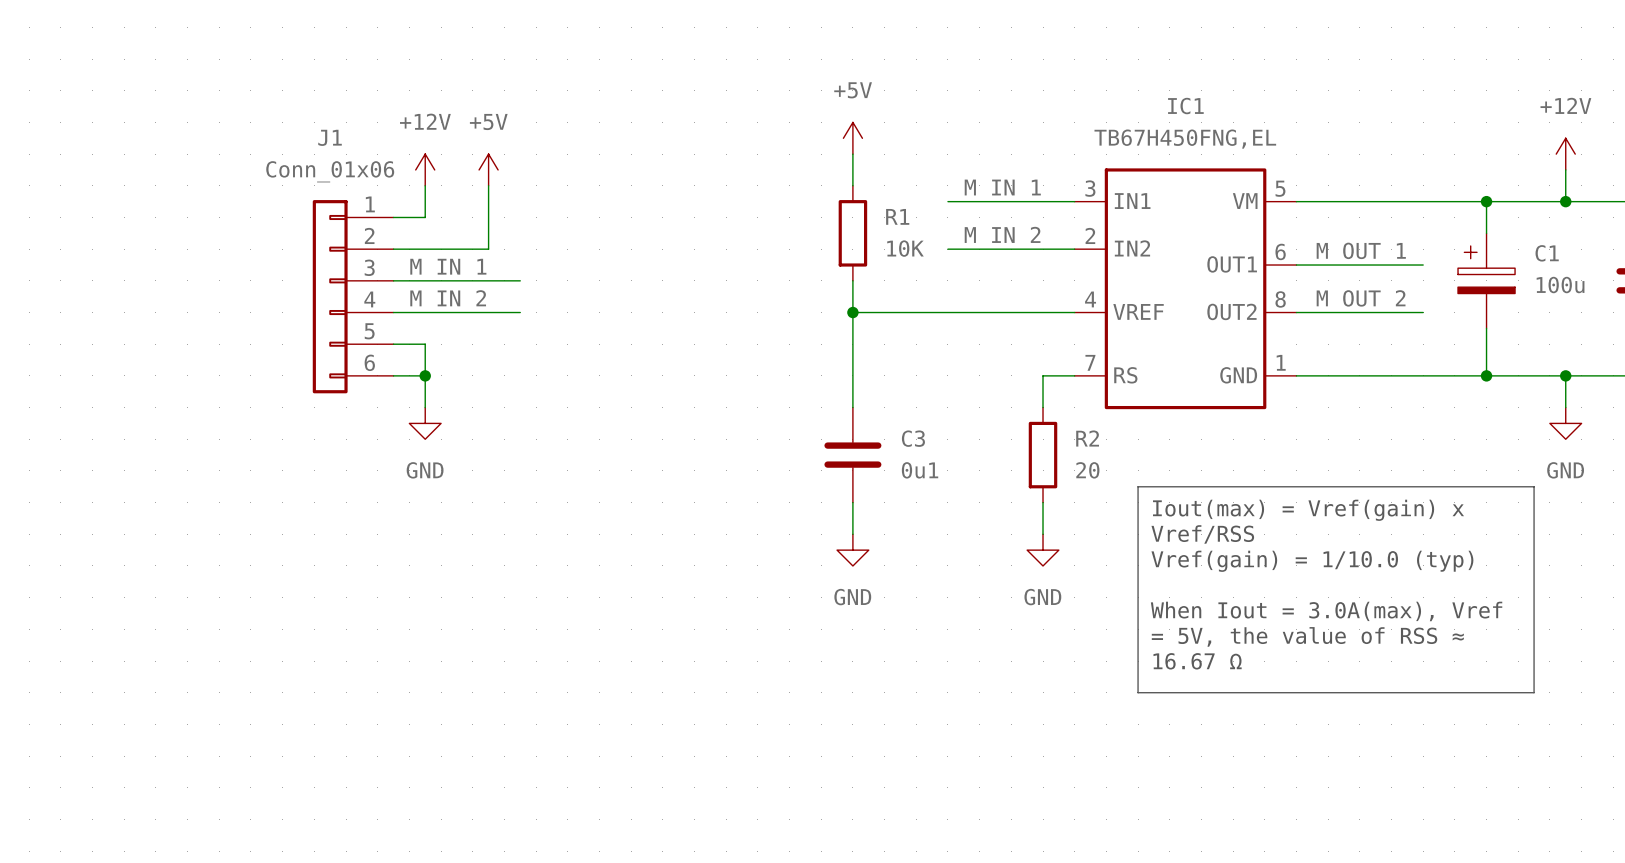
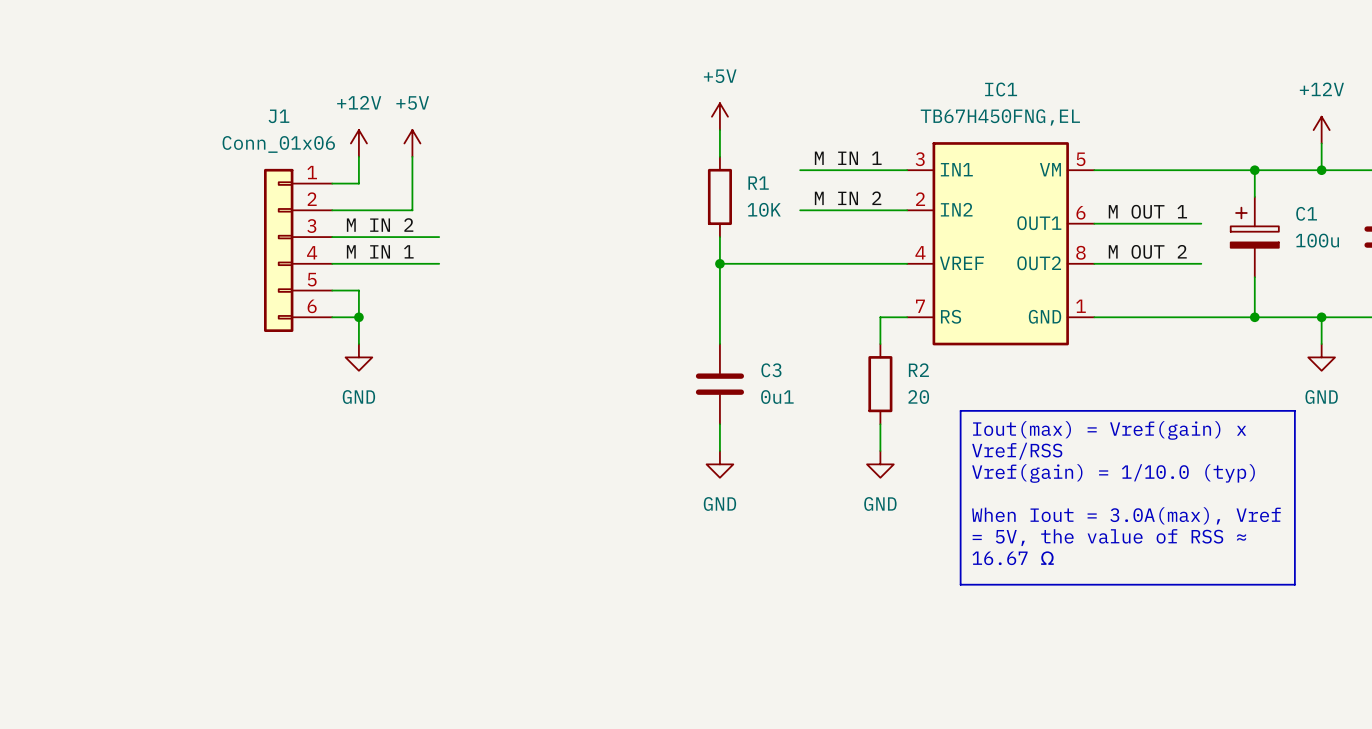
label: M IN 1 (448, 266) -> M IN 2 (380, 225)
label: M IN 2 (448, 298) -> M IN 1 (380, 251)

